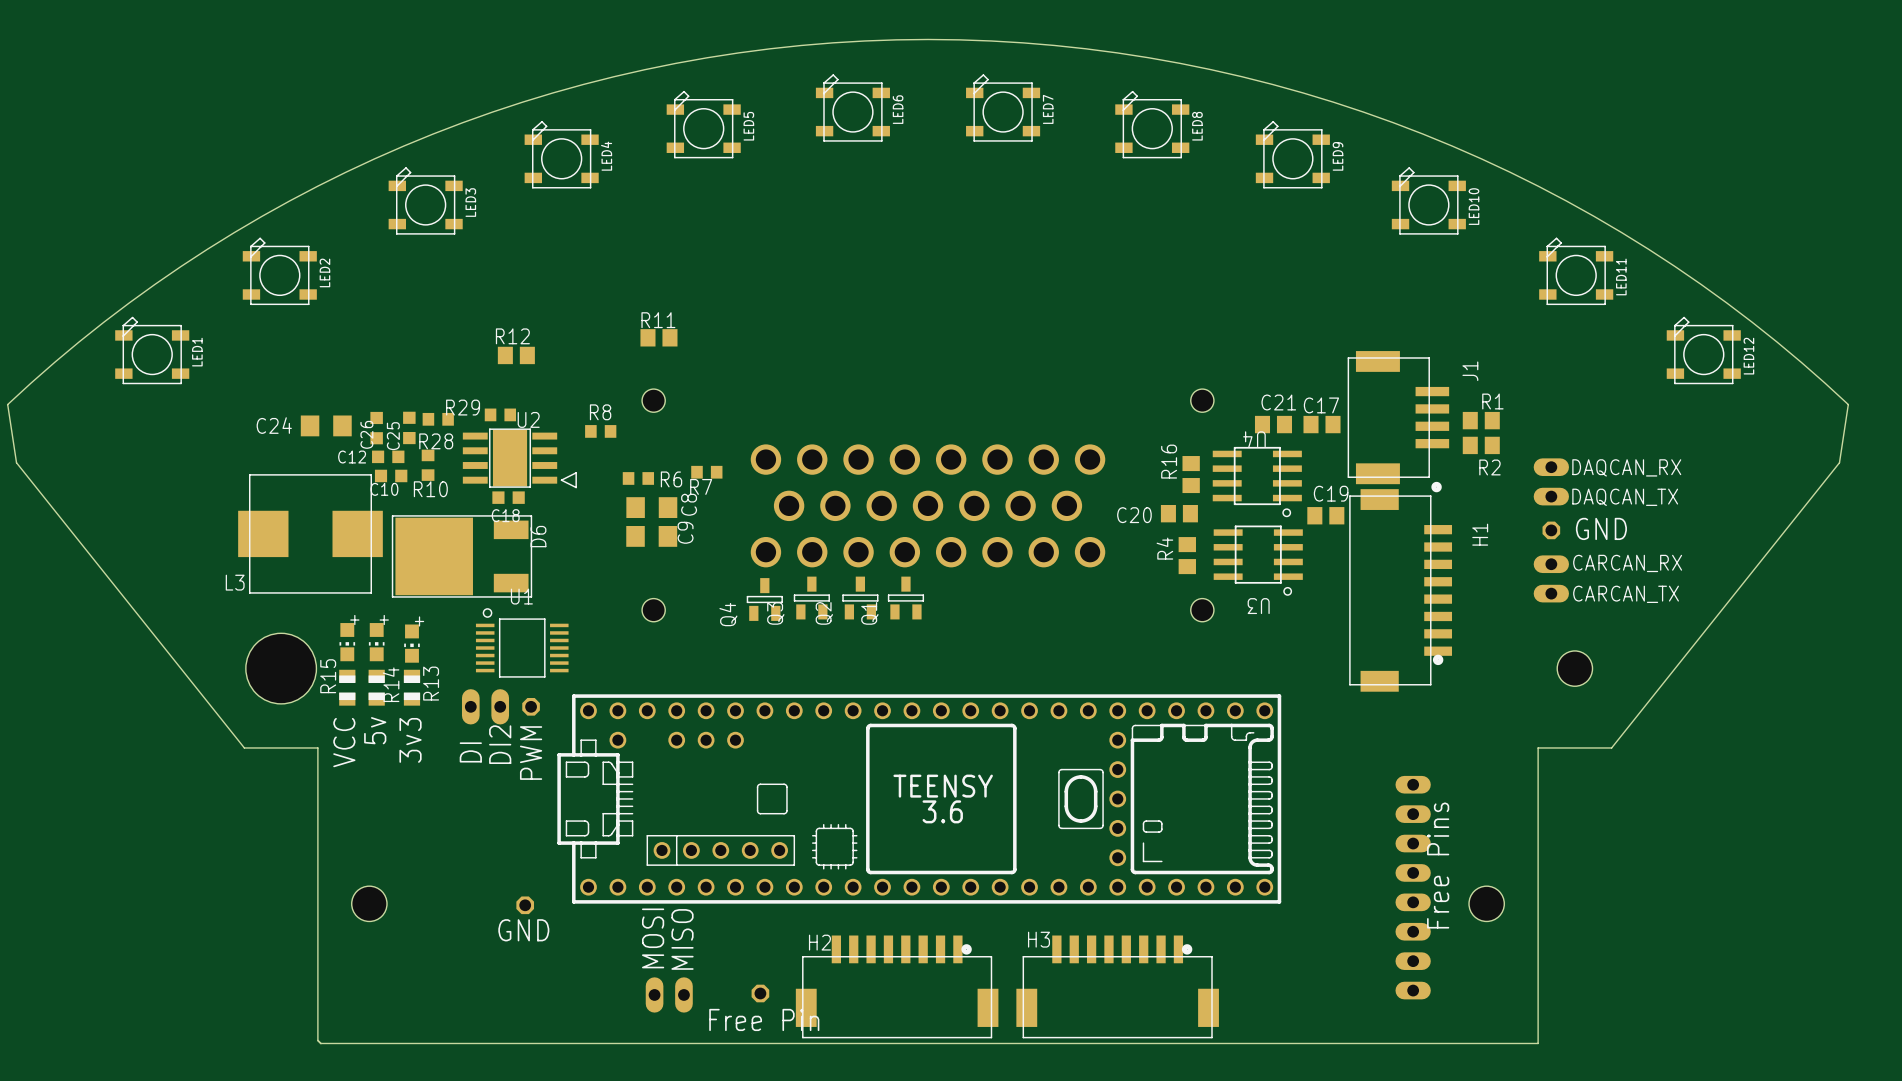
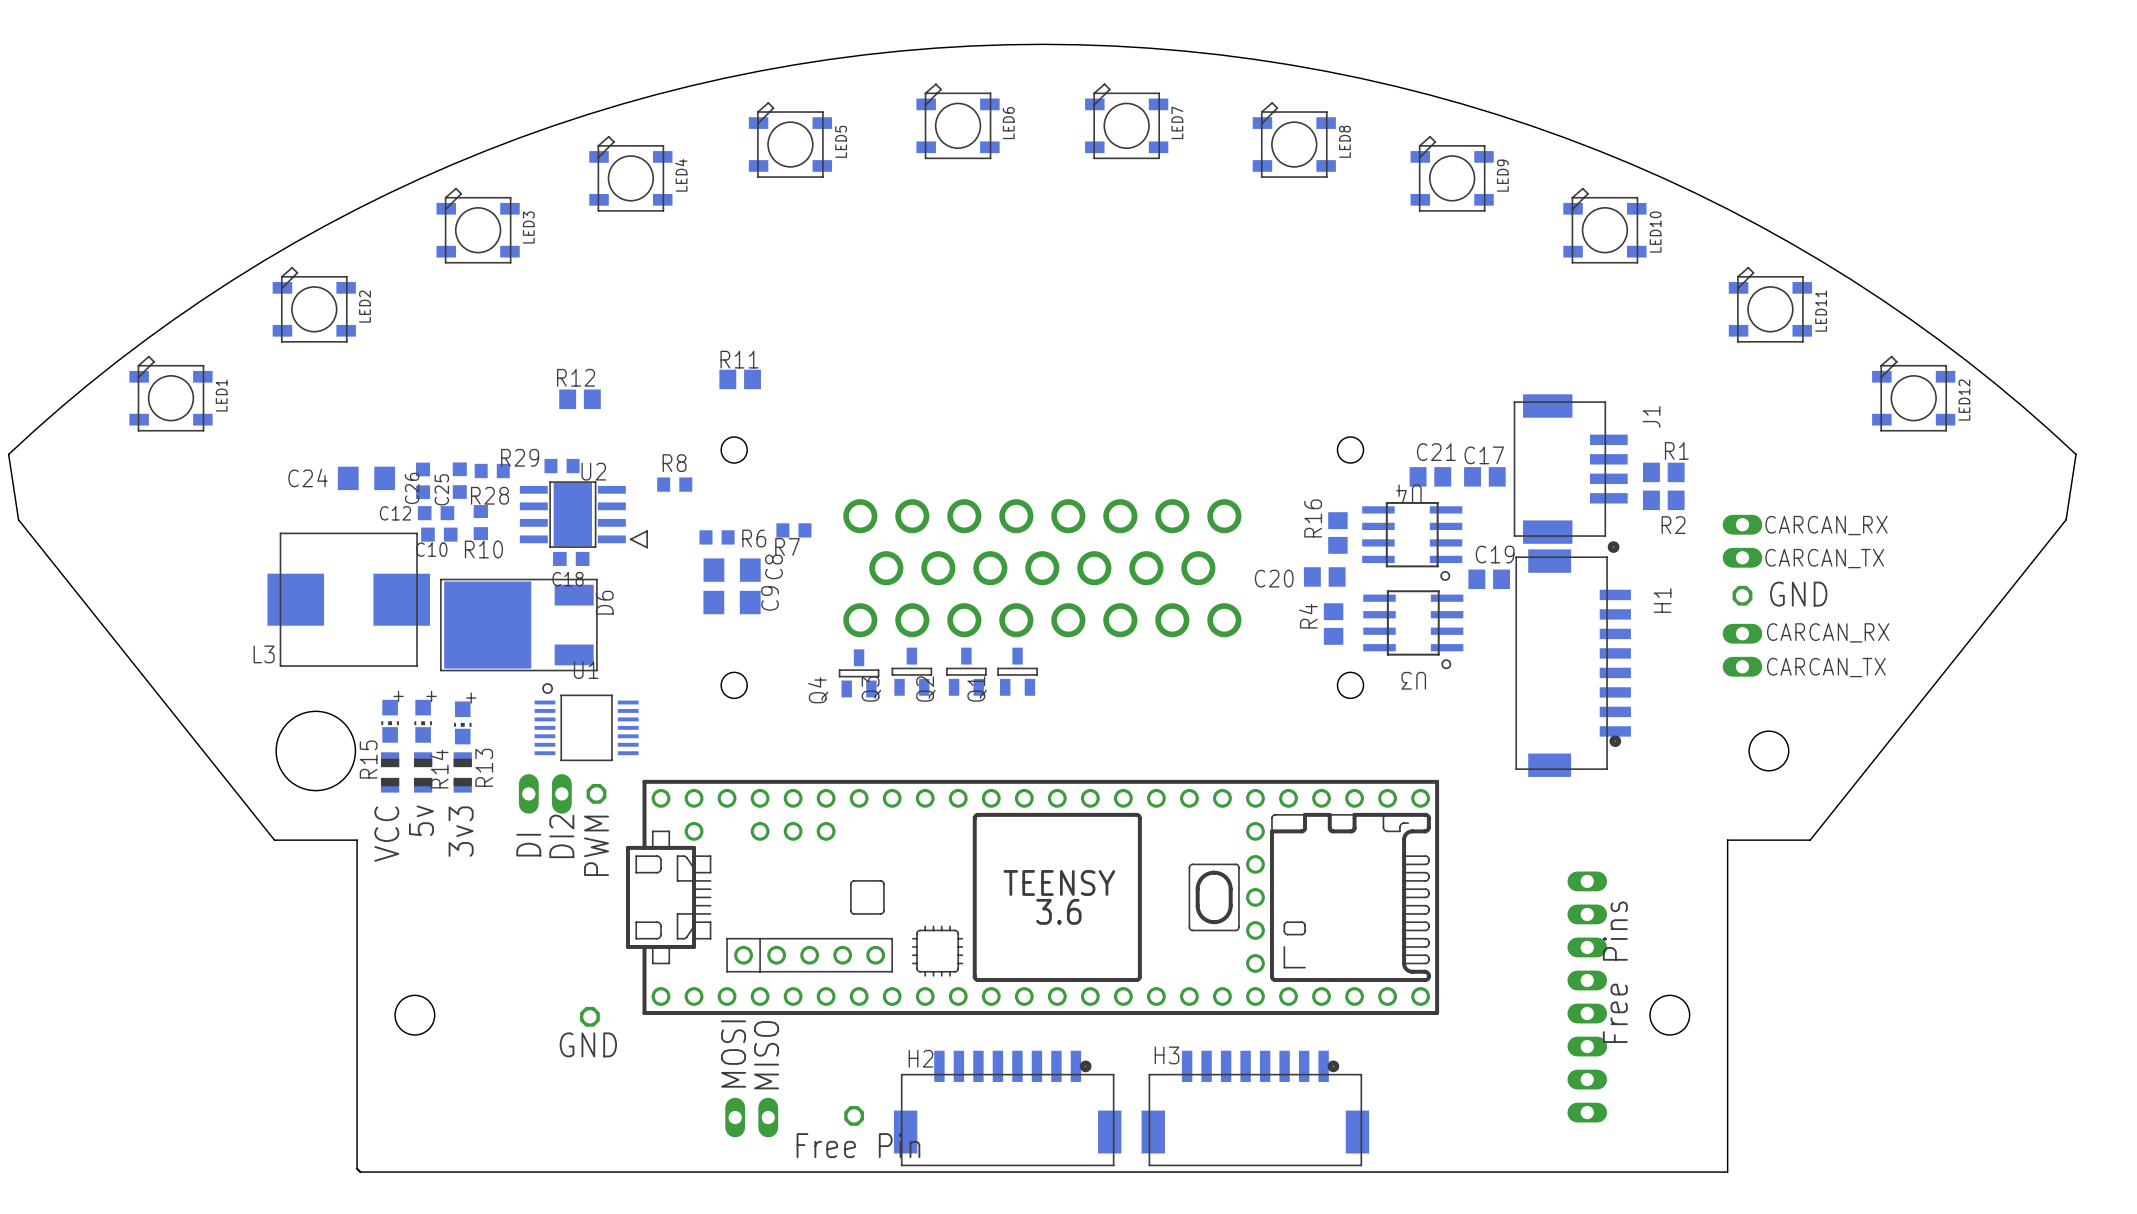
text: DAQCAN_RX (1626, 467) -> CARCAN_RX (1826, 525)
text: DAQCAN_TX (1625, 497) -> CARCAN_TX (1824, 558)

